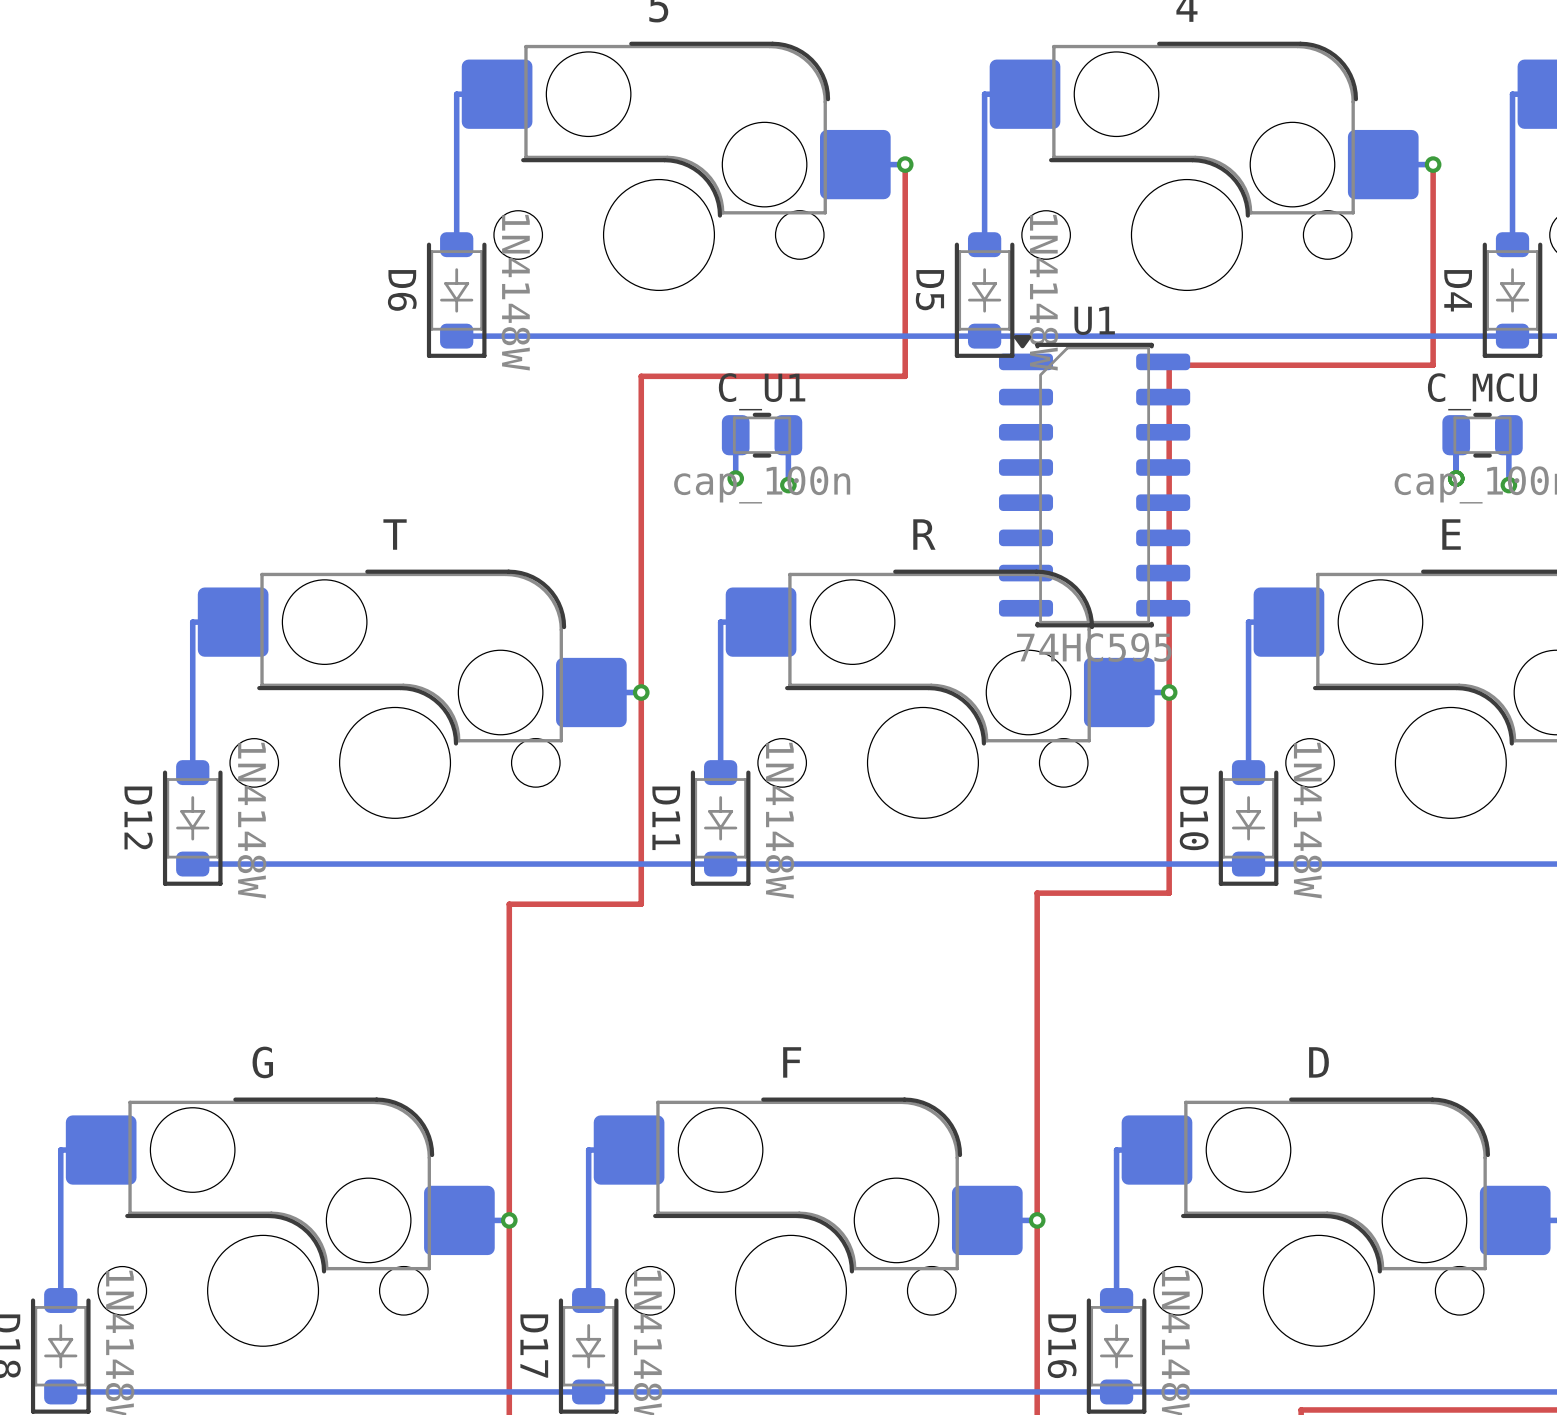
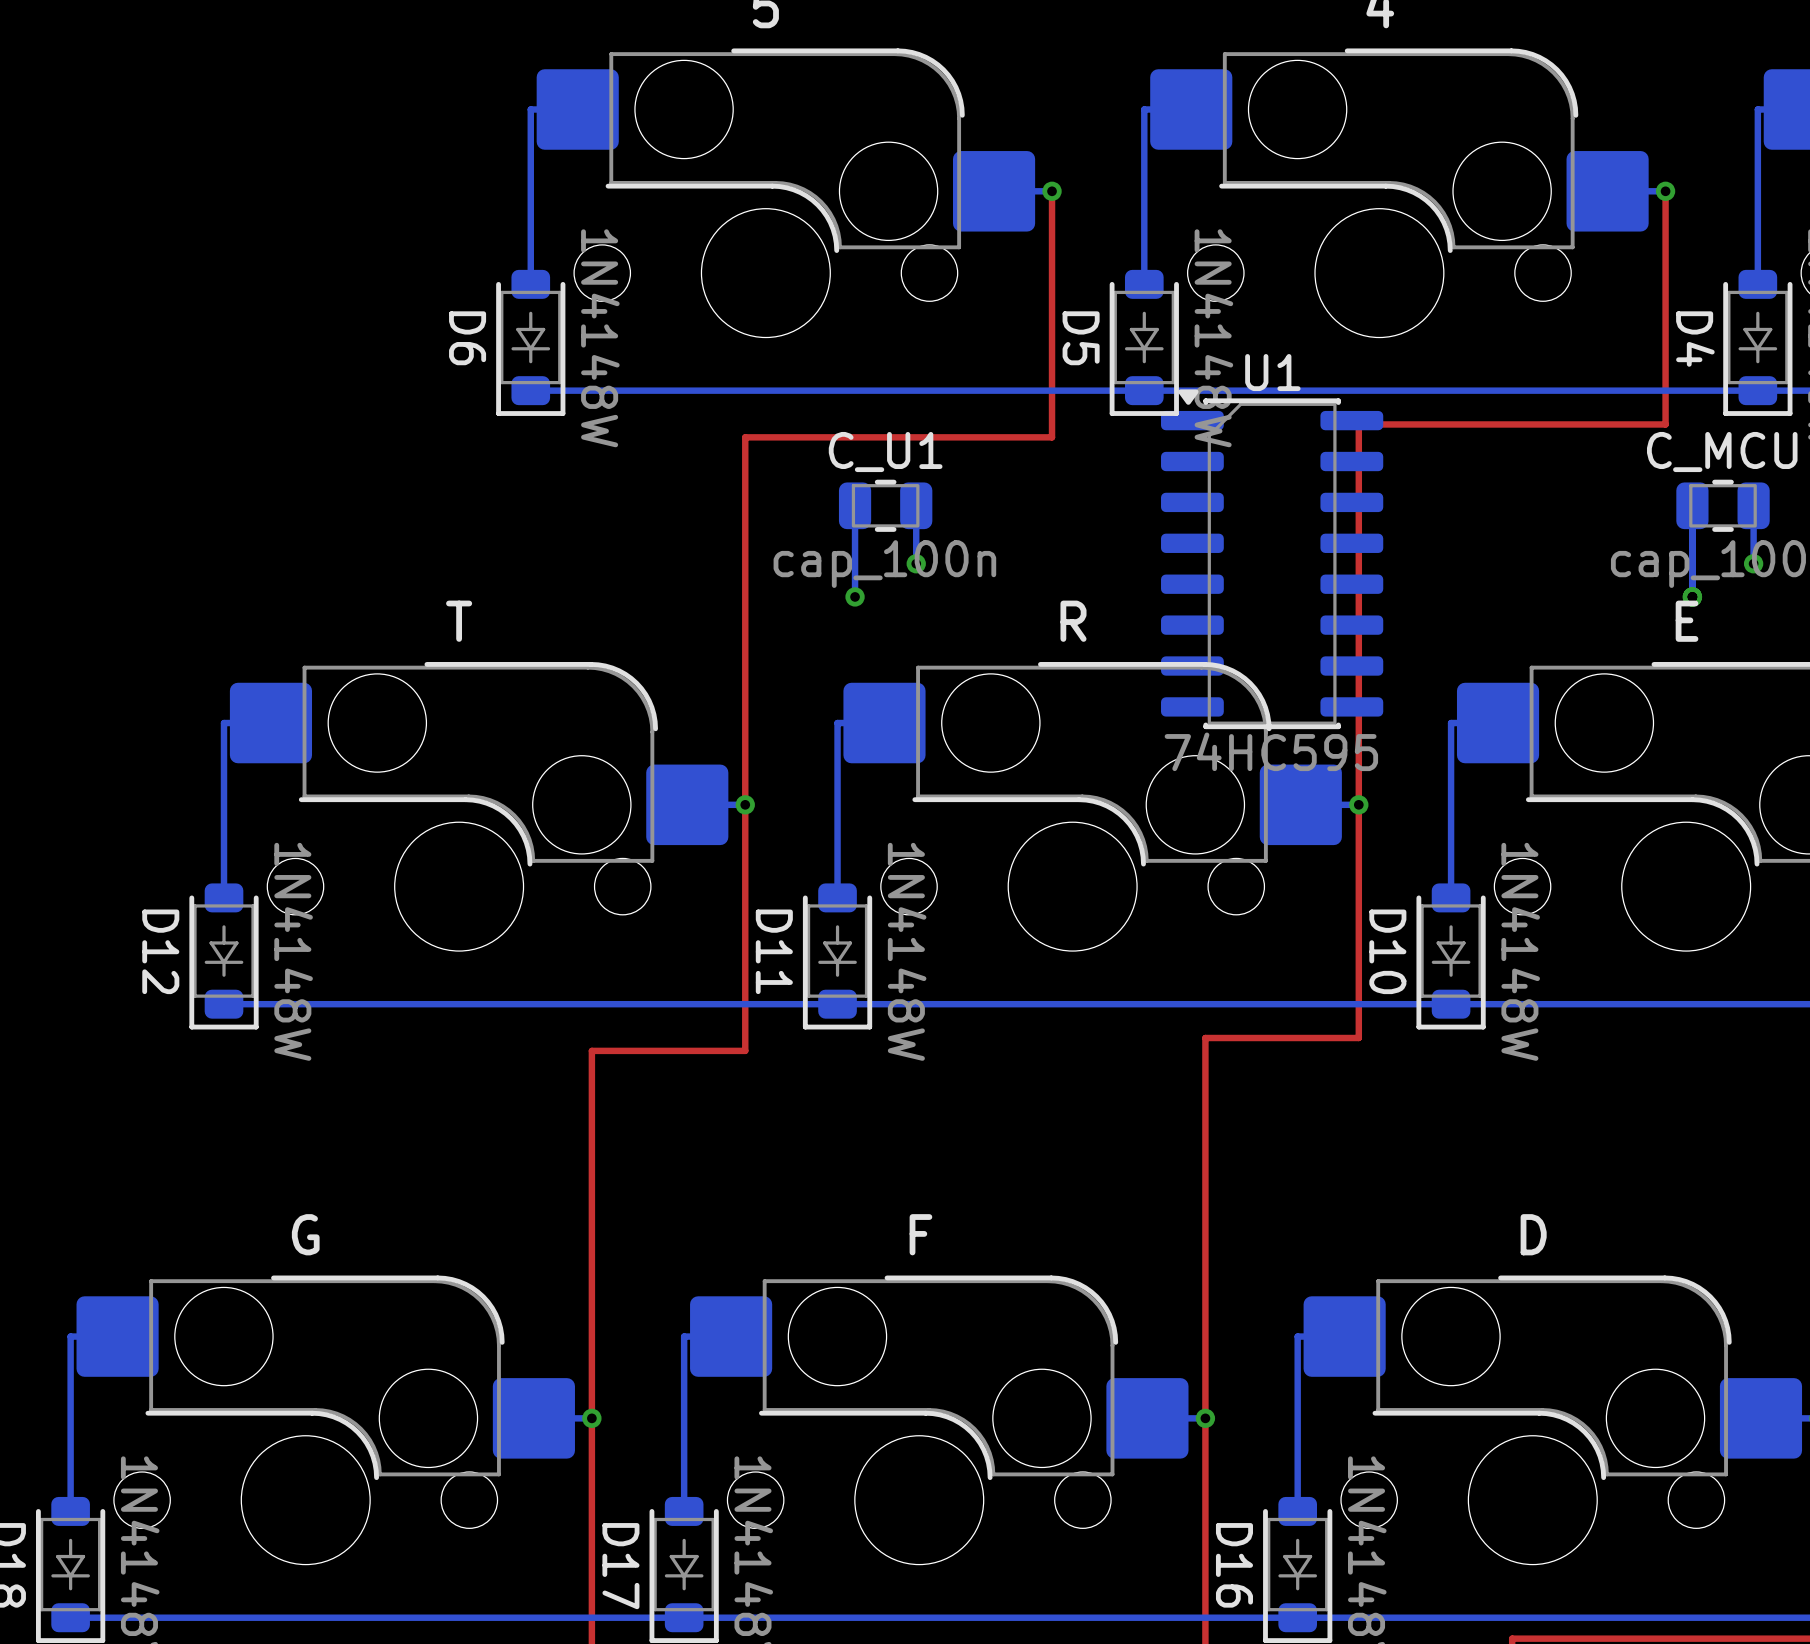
bottom track: none -> (855, 556) (855, 596)
via position: (735, 478) -> (855, 596)
bottom track: none -> (1692, 556) (1692, 596)
via position: (1456, 478) -> (1692, 596)

